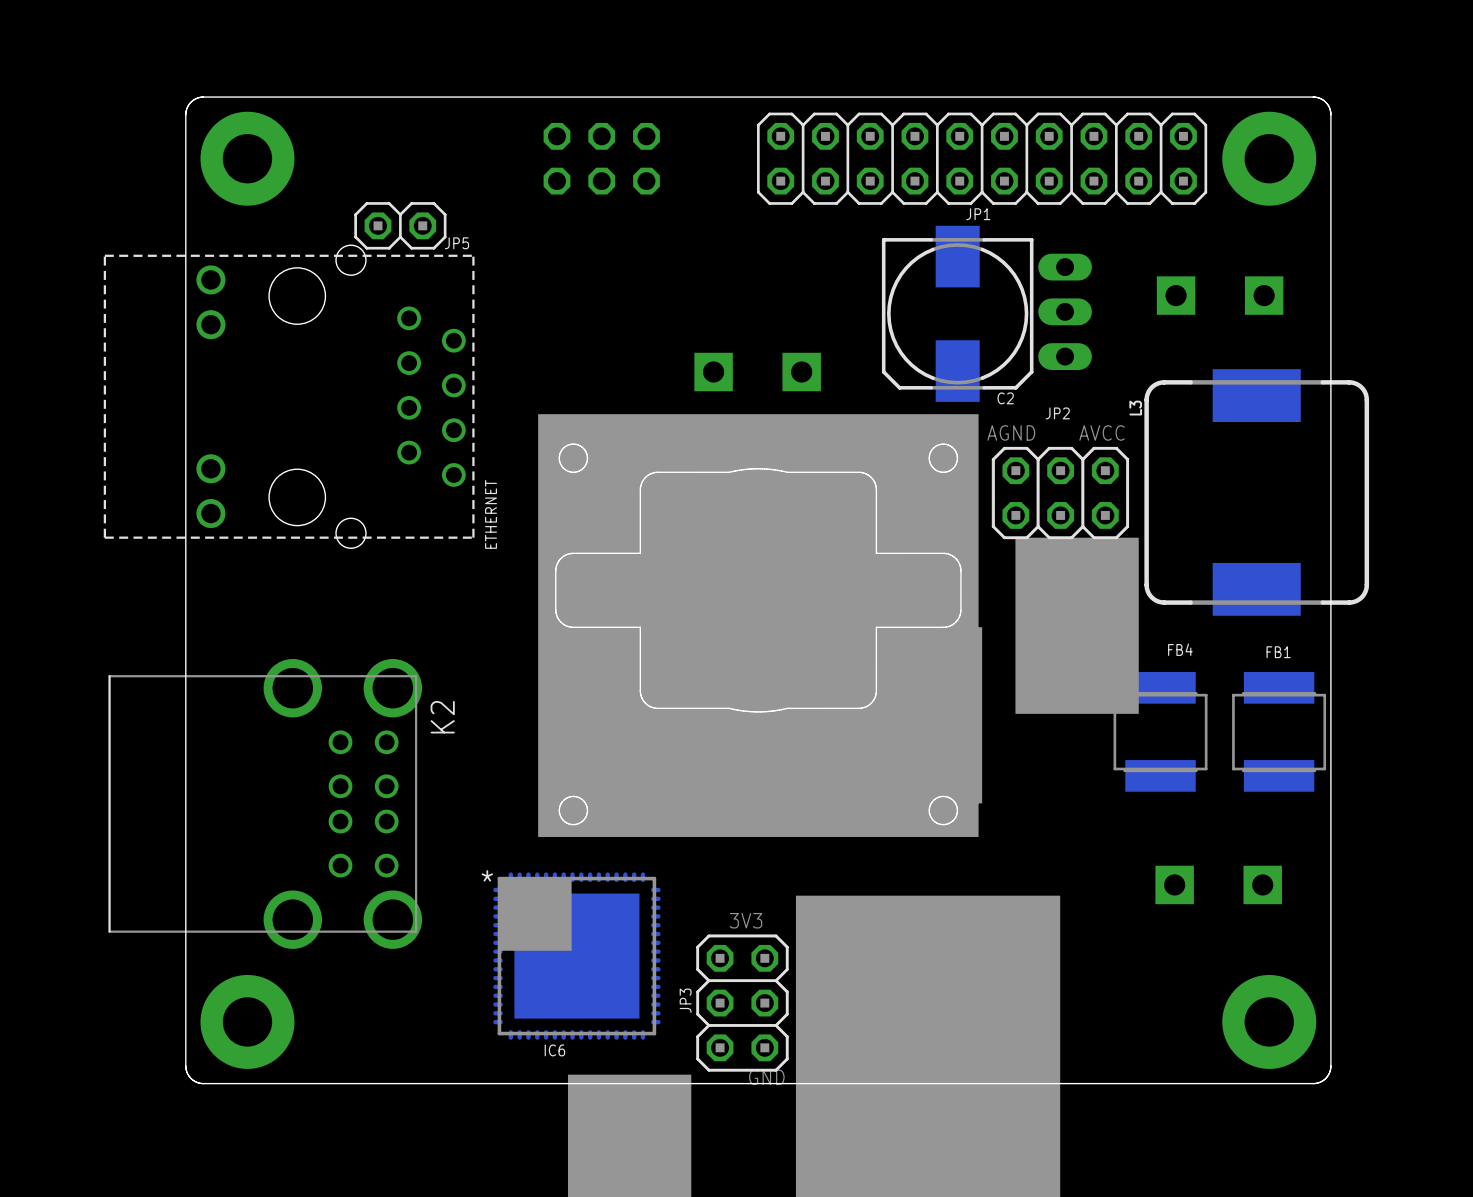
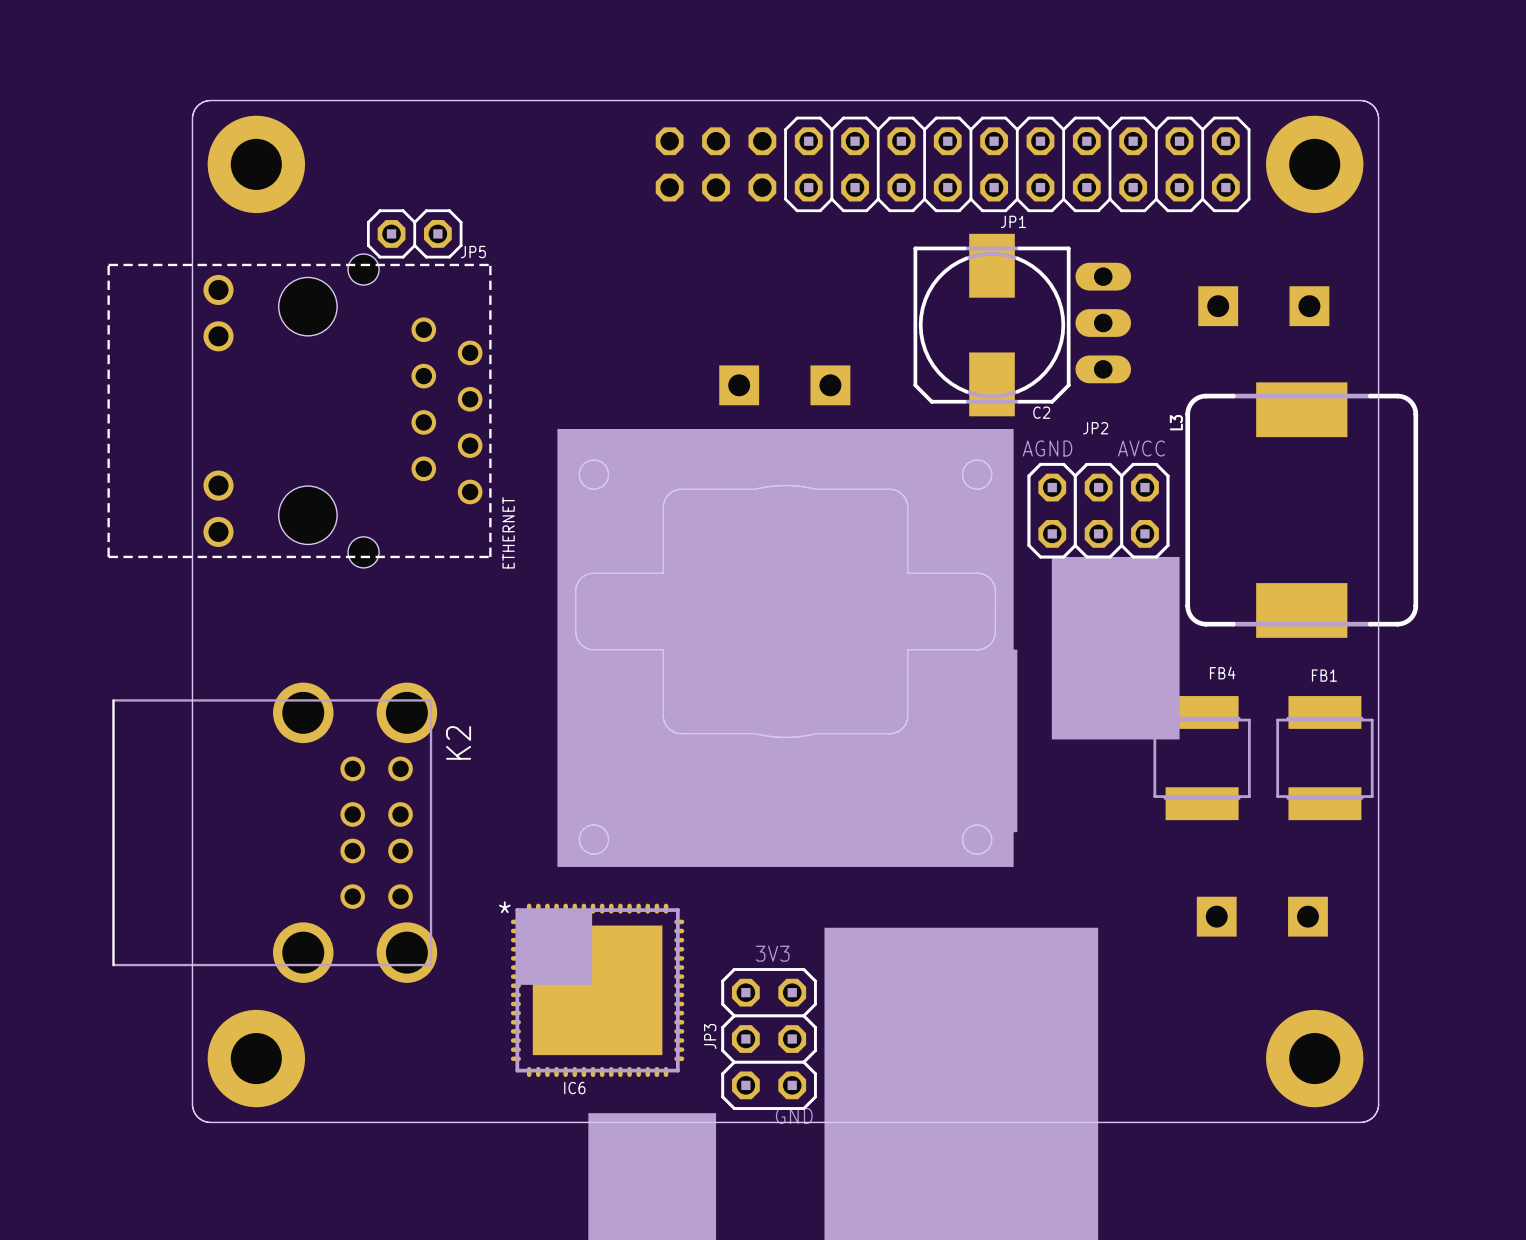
part position: (601, 158) -> (716, 164)

